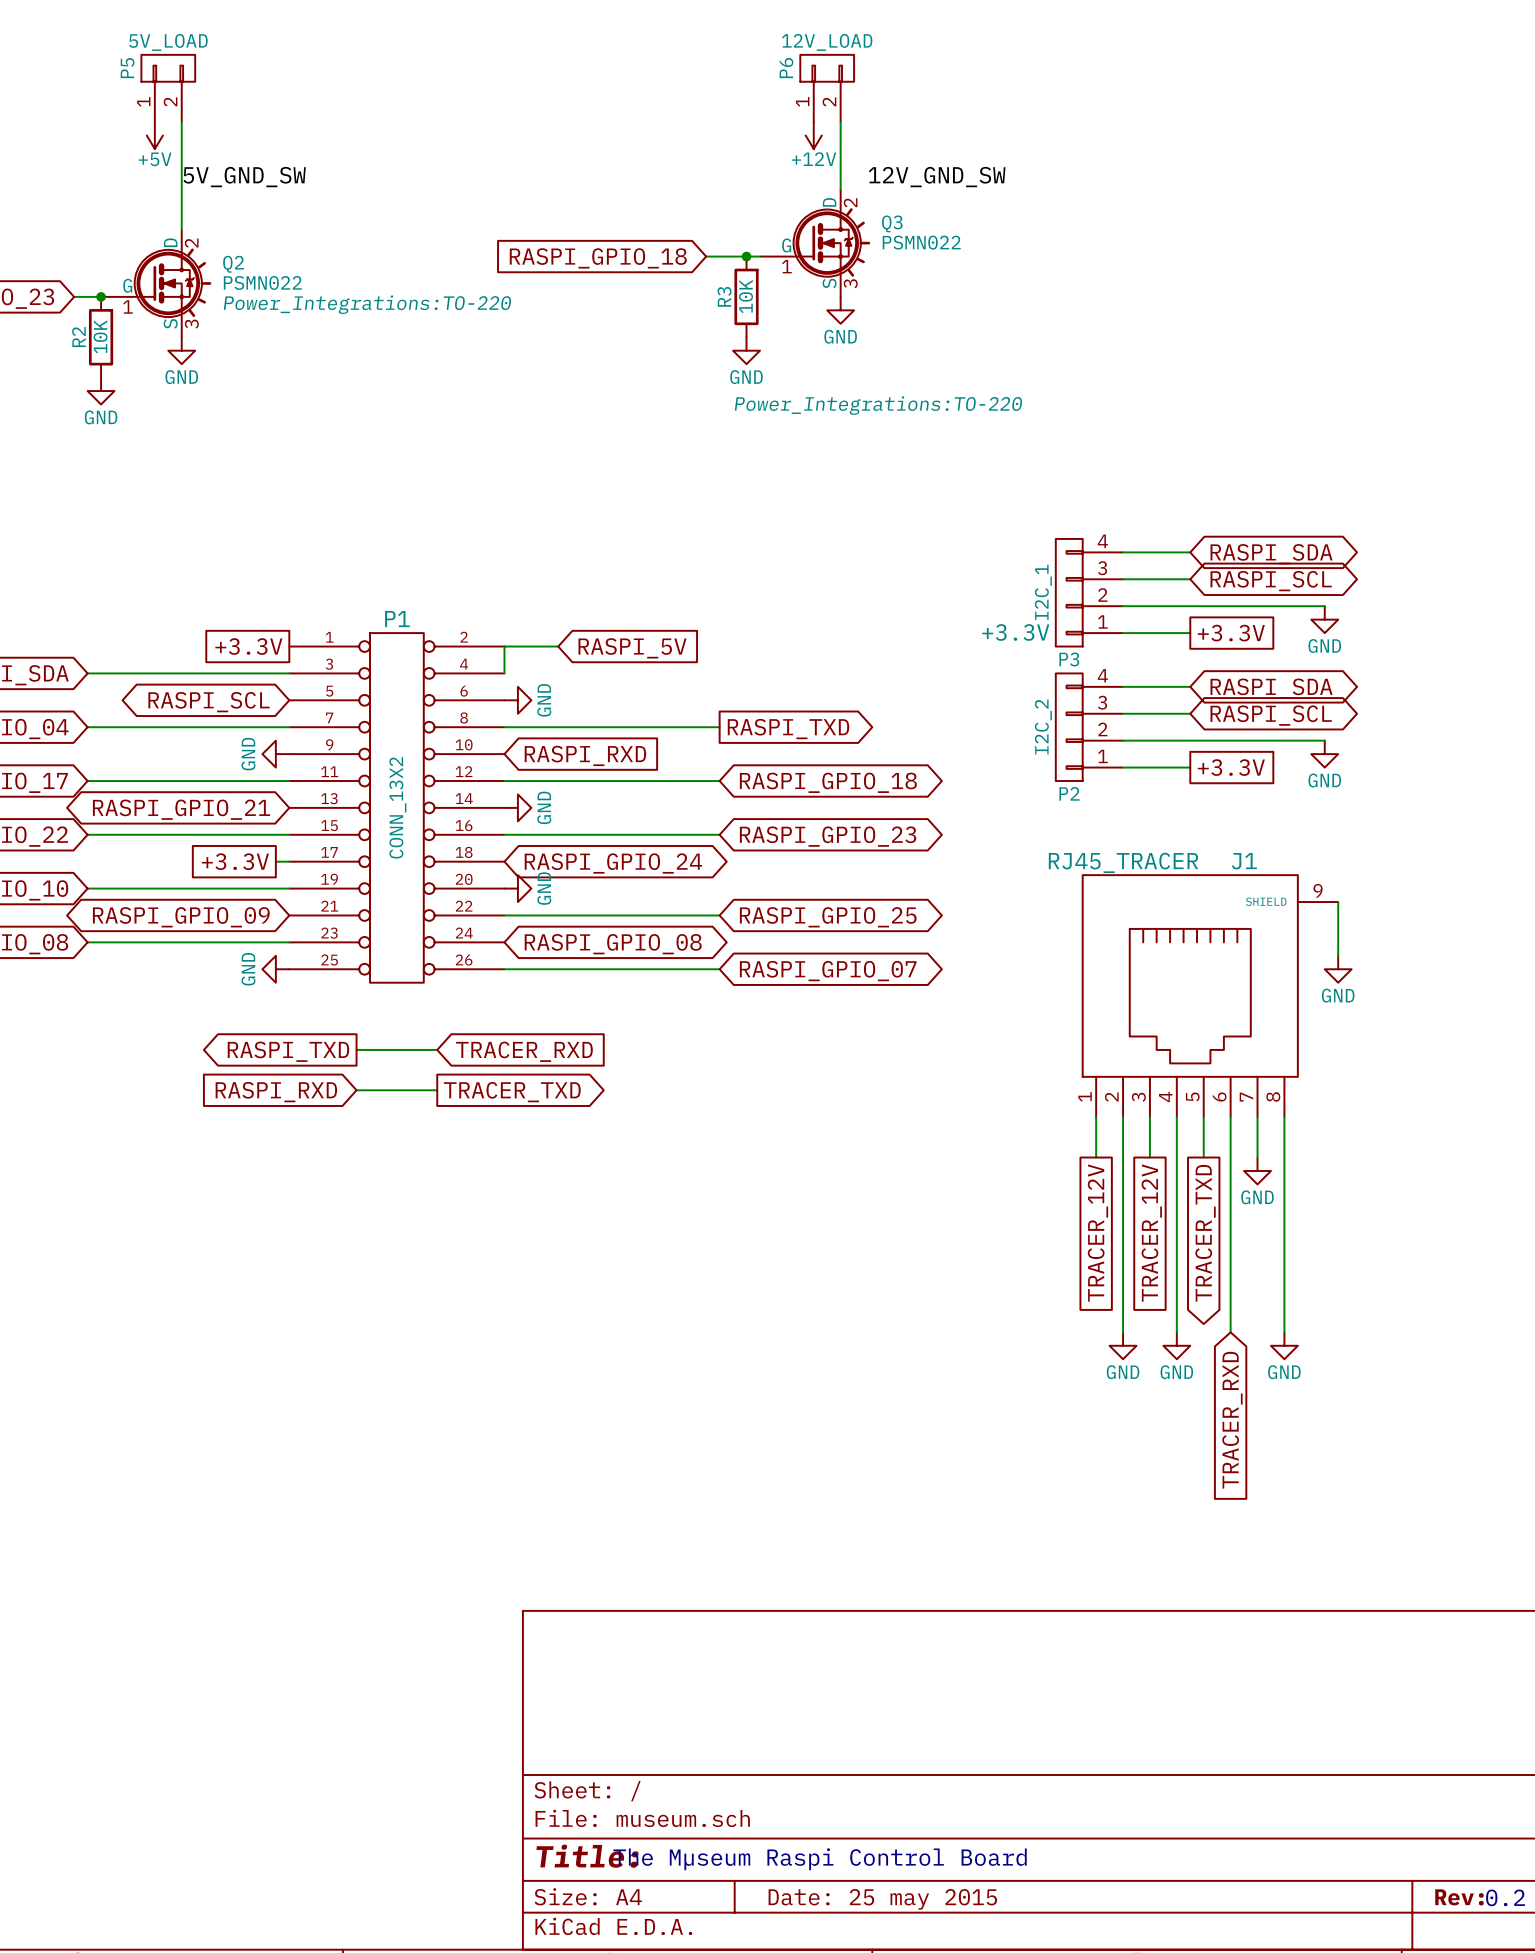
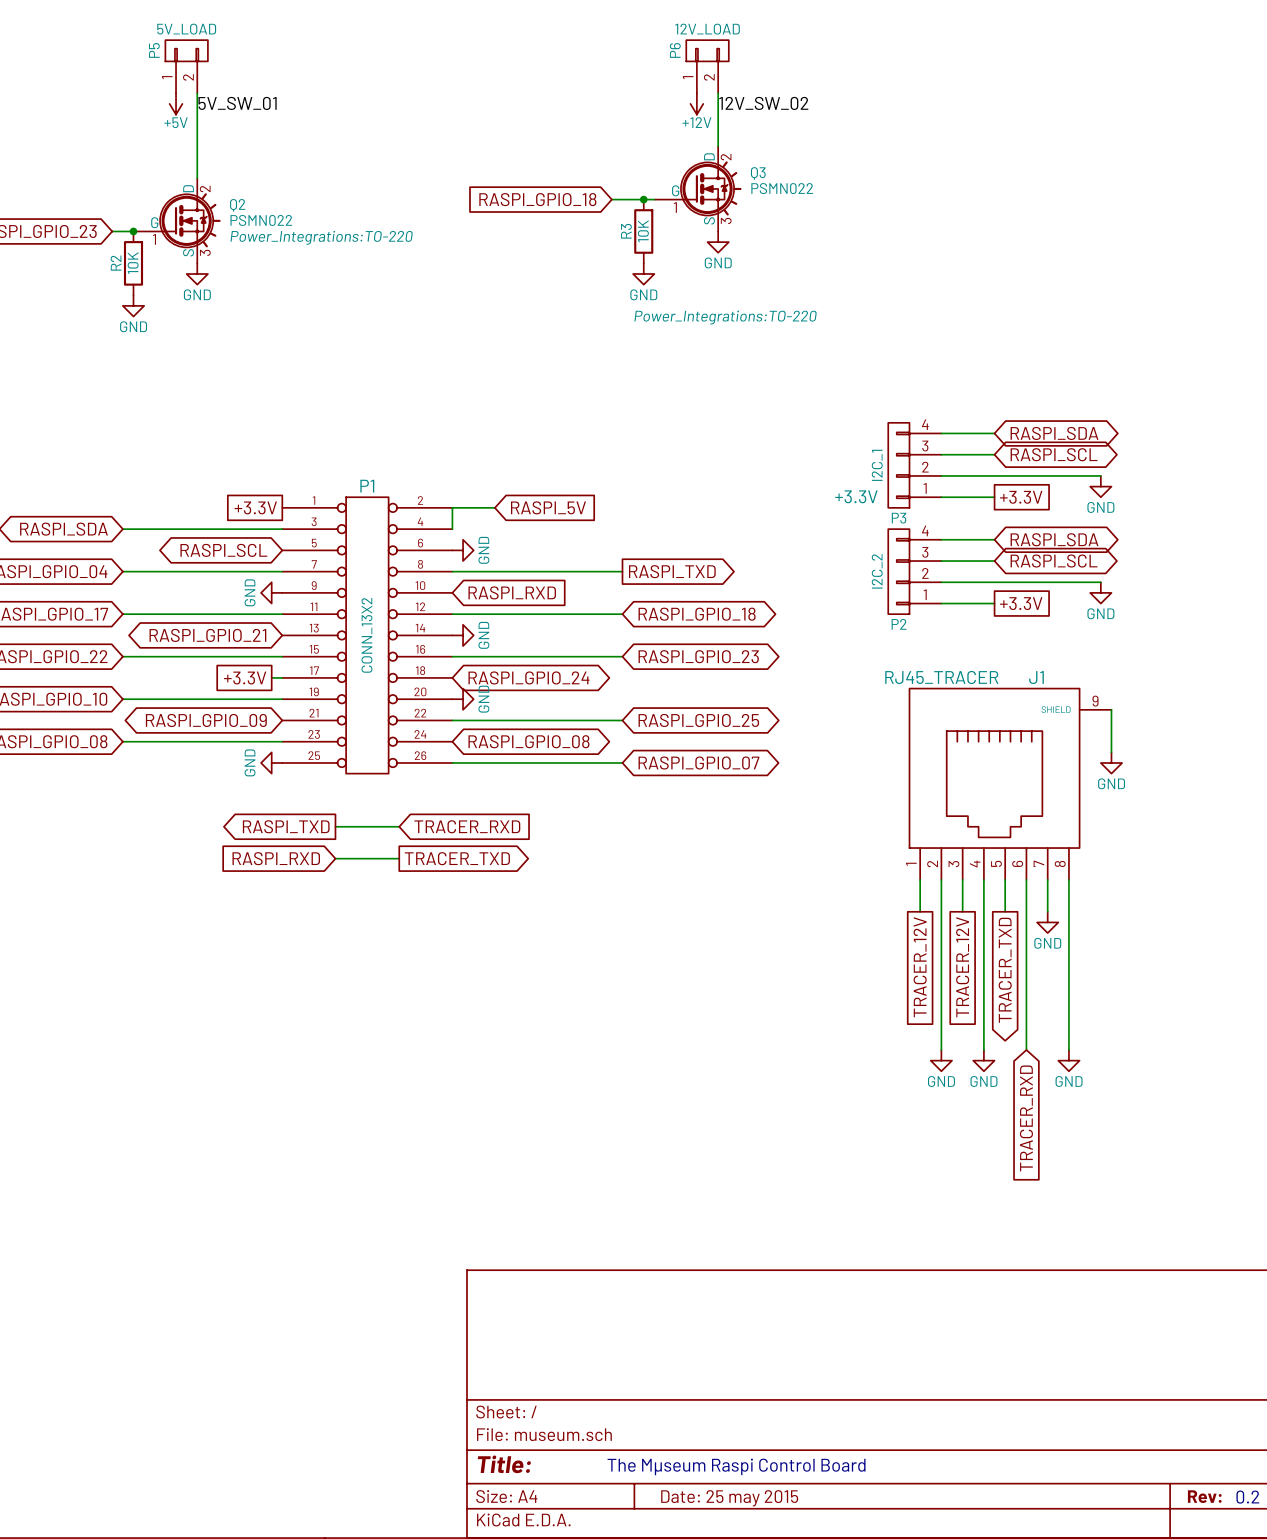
label: none -> 5V_SW_01 (237, 103)
label: none -> 12V_SW_02 (763, 103)
label: 5V_GND_SW (244, 177) -> none
label: 12V_GND_SW (937, 177) -> none

